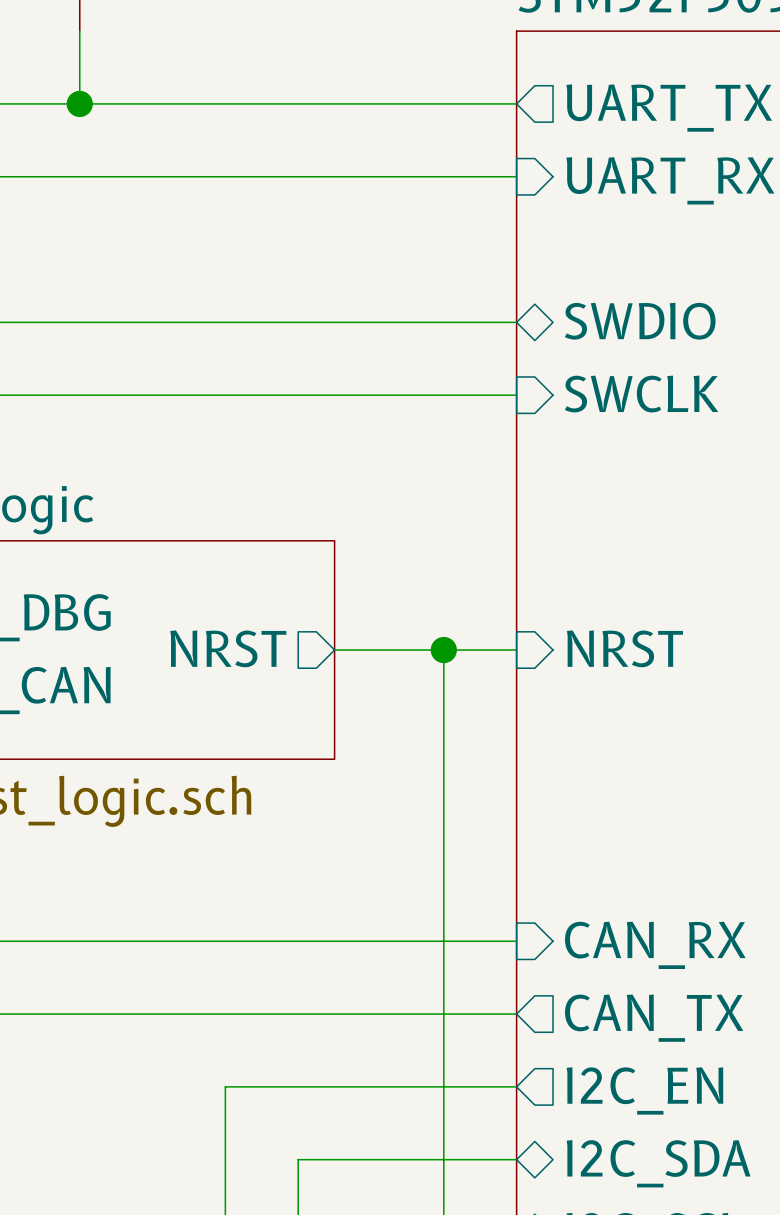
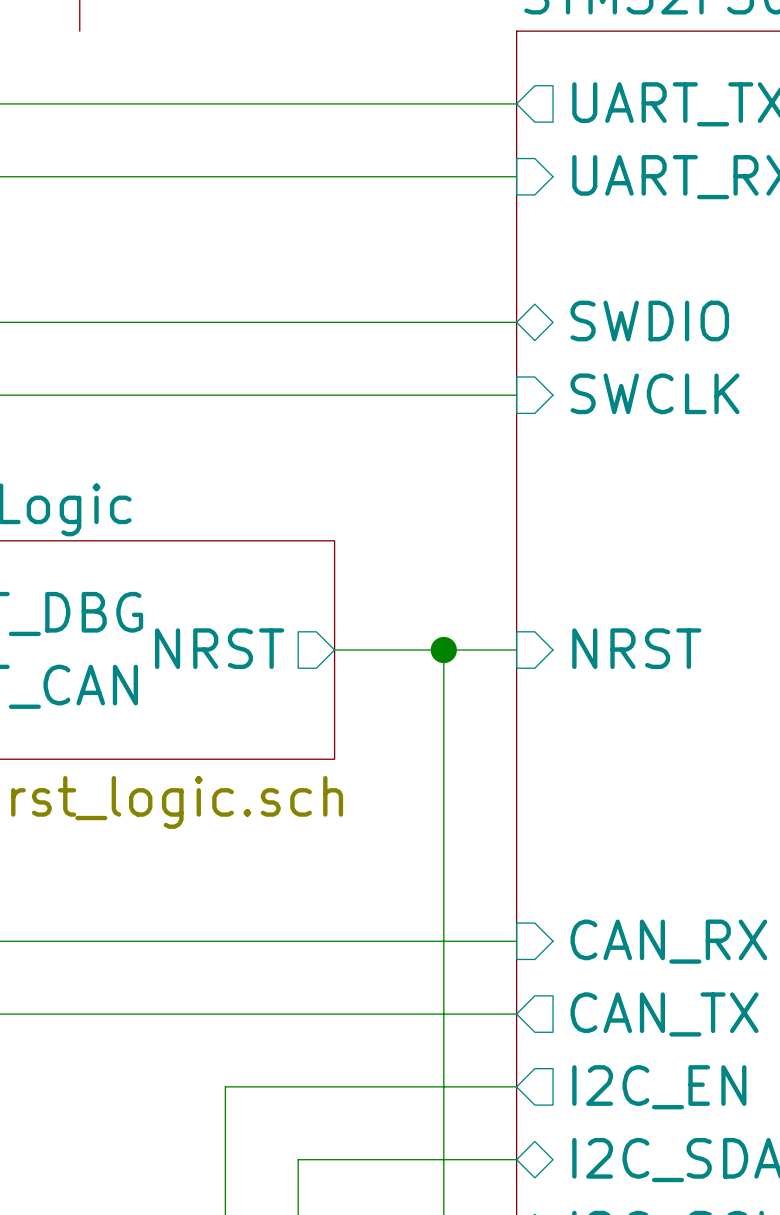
wire: (79, 31) (79, 103) -> none
junction: (79, 103) -> none

